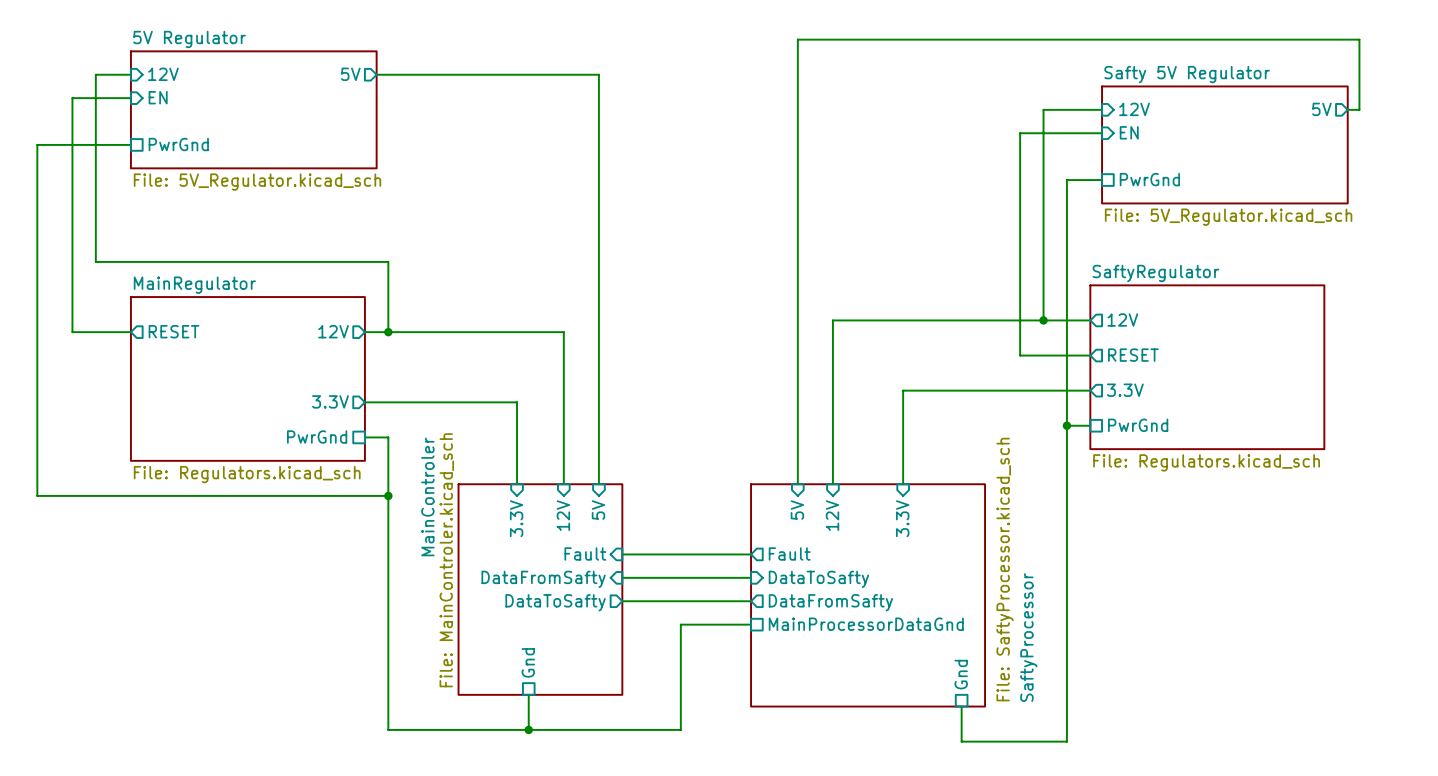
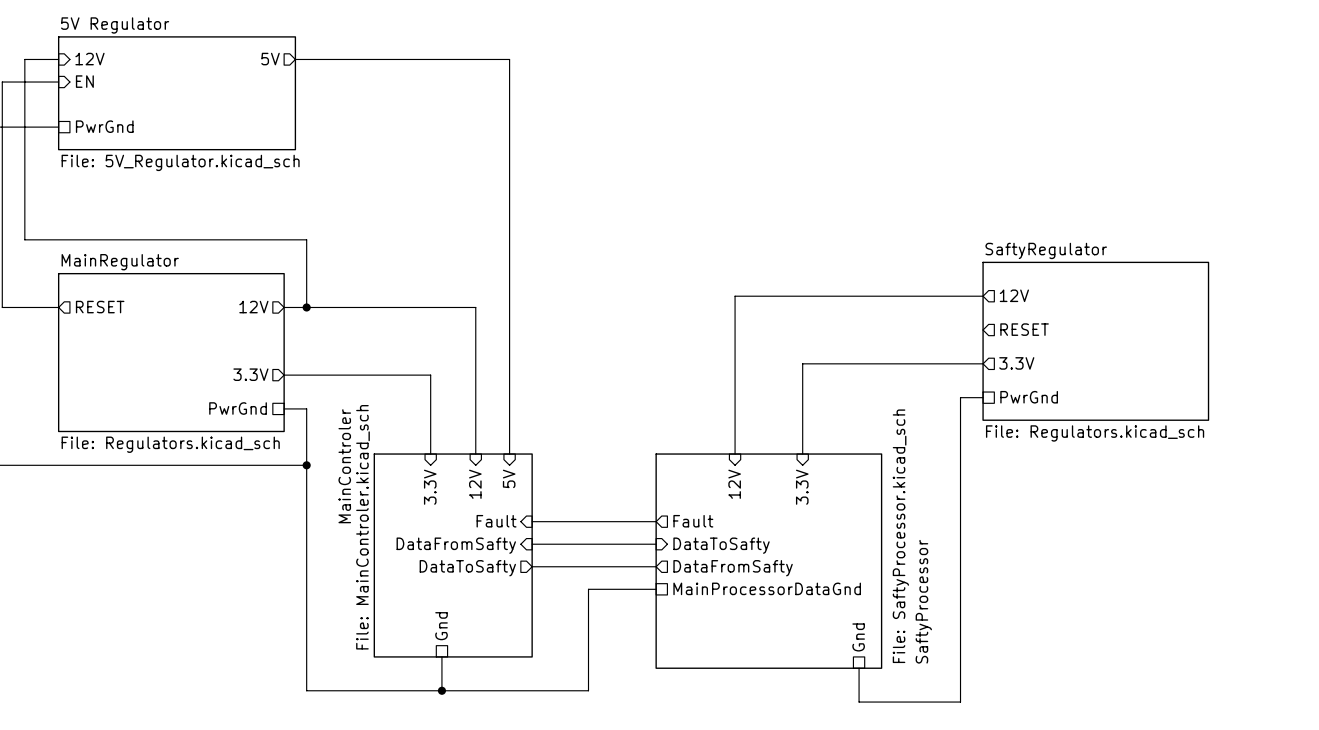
wire: (1102, 109) (1043, 109) (1043, 320) -> none
sheet pin: 12V (1134, 109) -> none
sheet pin: 5V (1321, 109) -> none
wire: (1347, 109) (1359, 109) (1359, 39) (797, 39) (797, 484) -> none
sheet pin: EN (1129, 132) -> none
wire: (1102, 133) (1020, 133) (1020, 355) (1090, 355) -> none
sheet Safty 5V Regulator: File: 5V_Regulator.kicad_sch (1224, 144) -> none
sheet pin: PwrGnd (1149, 179) -> none
wire: (1102, 180) (1066, 180) (1066, 425) -> none
junction: (1043, 320) -> none
junction: (1066, 425) -> none
sheet pin: 5V (797, 510) -> none

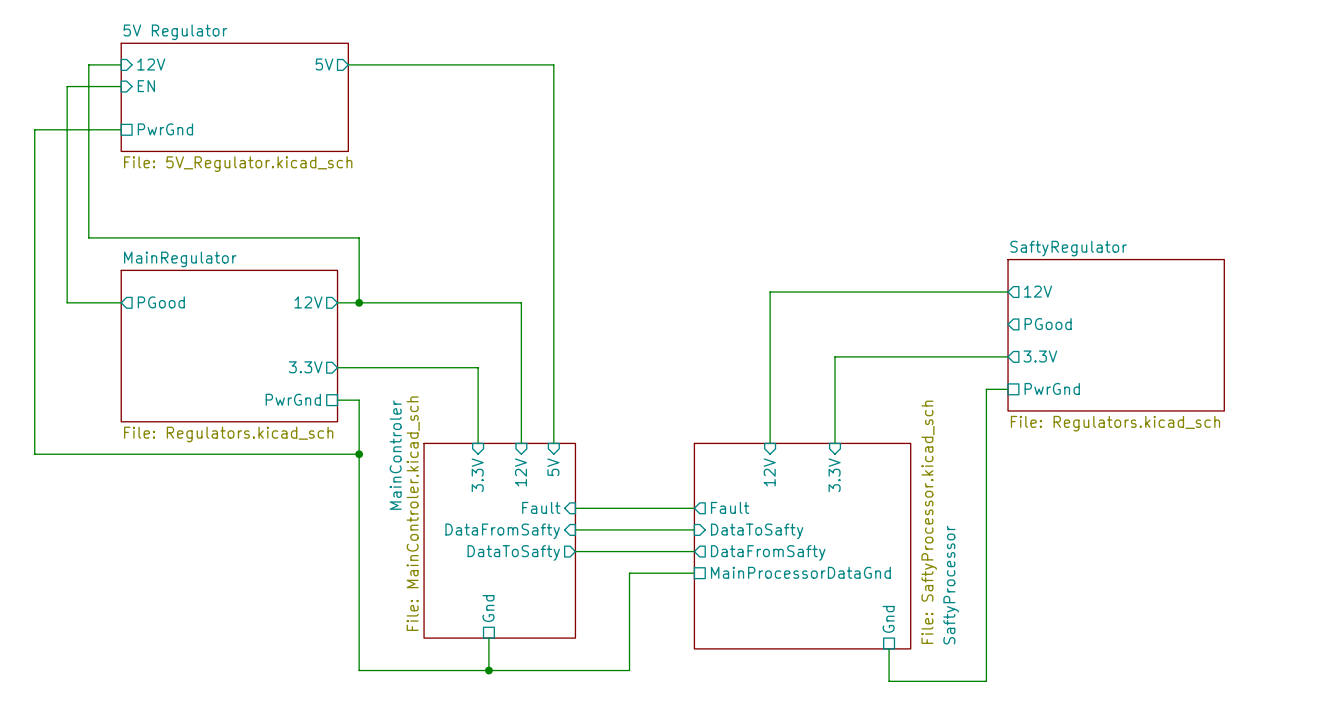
sheet pin: RESET (100, 307) -> PGood (161, 302)
sheet pin: RESET (1024, 329) -> PGood (1048, 324)

